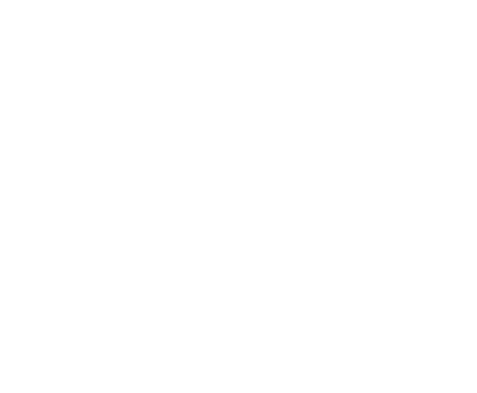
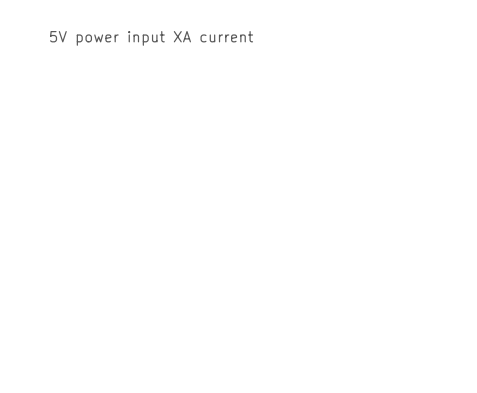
text: none -> 5V power input XA current (151, 38)

